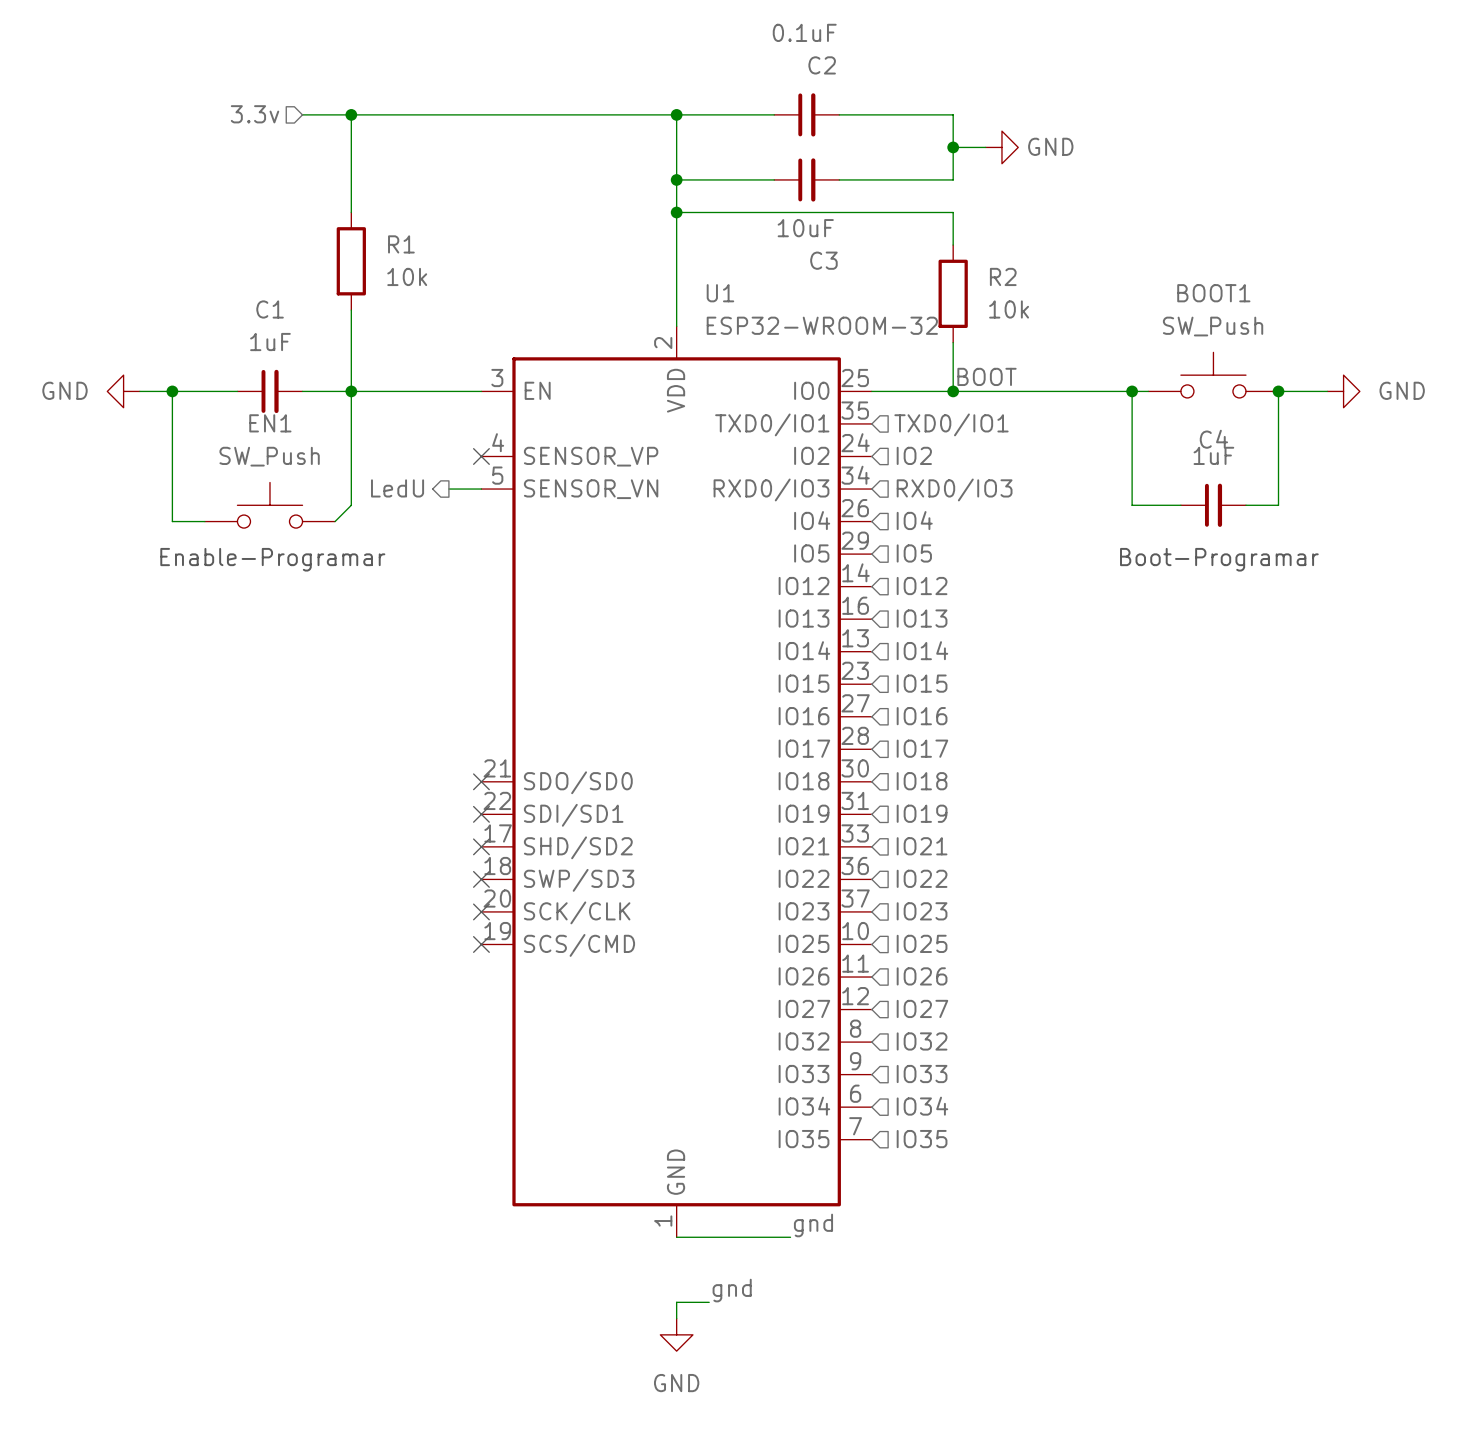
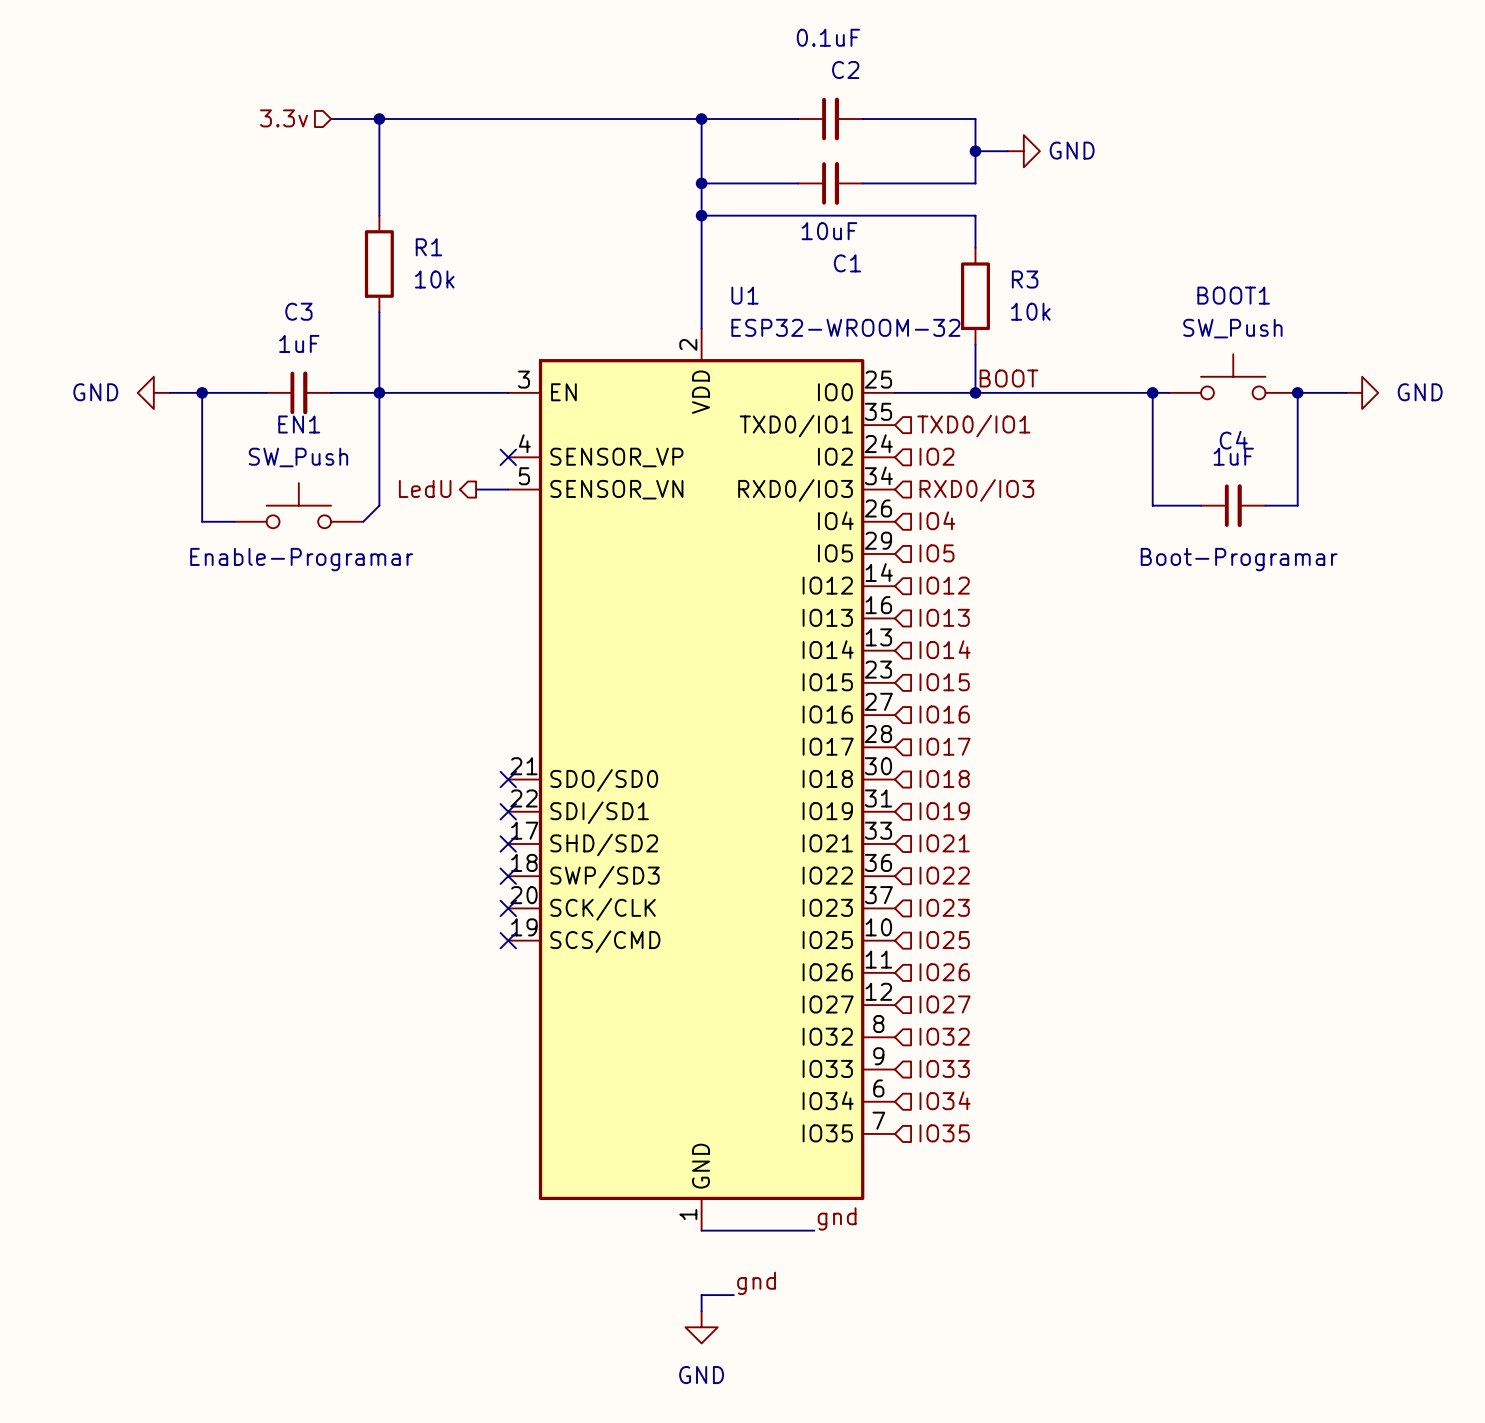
C3 name: C3 (823, 260) -> C1 (847, 263)
R2 name: R2 (1003, 276) -> R3 (1025, 279)
C1 name: C1 (270, 309) -> C3 (298, 311)

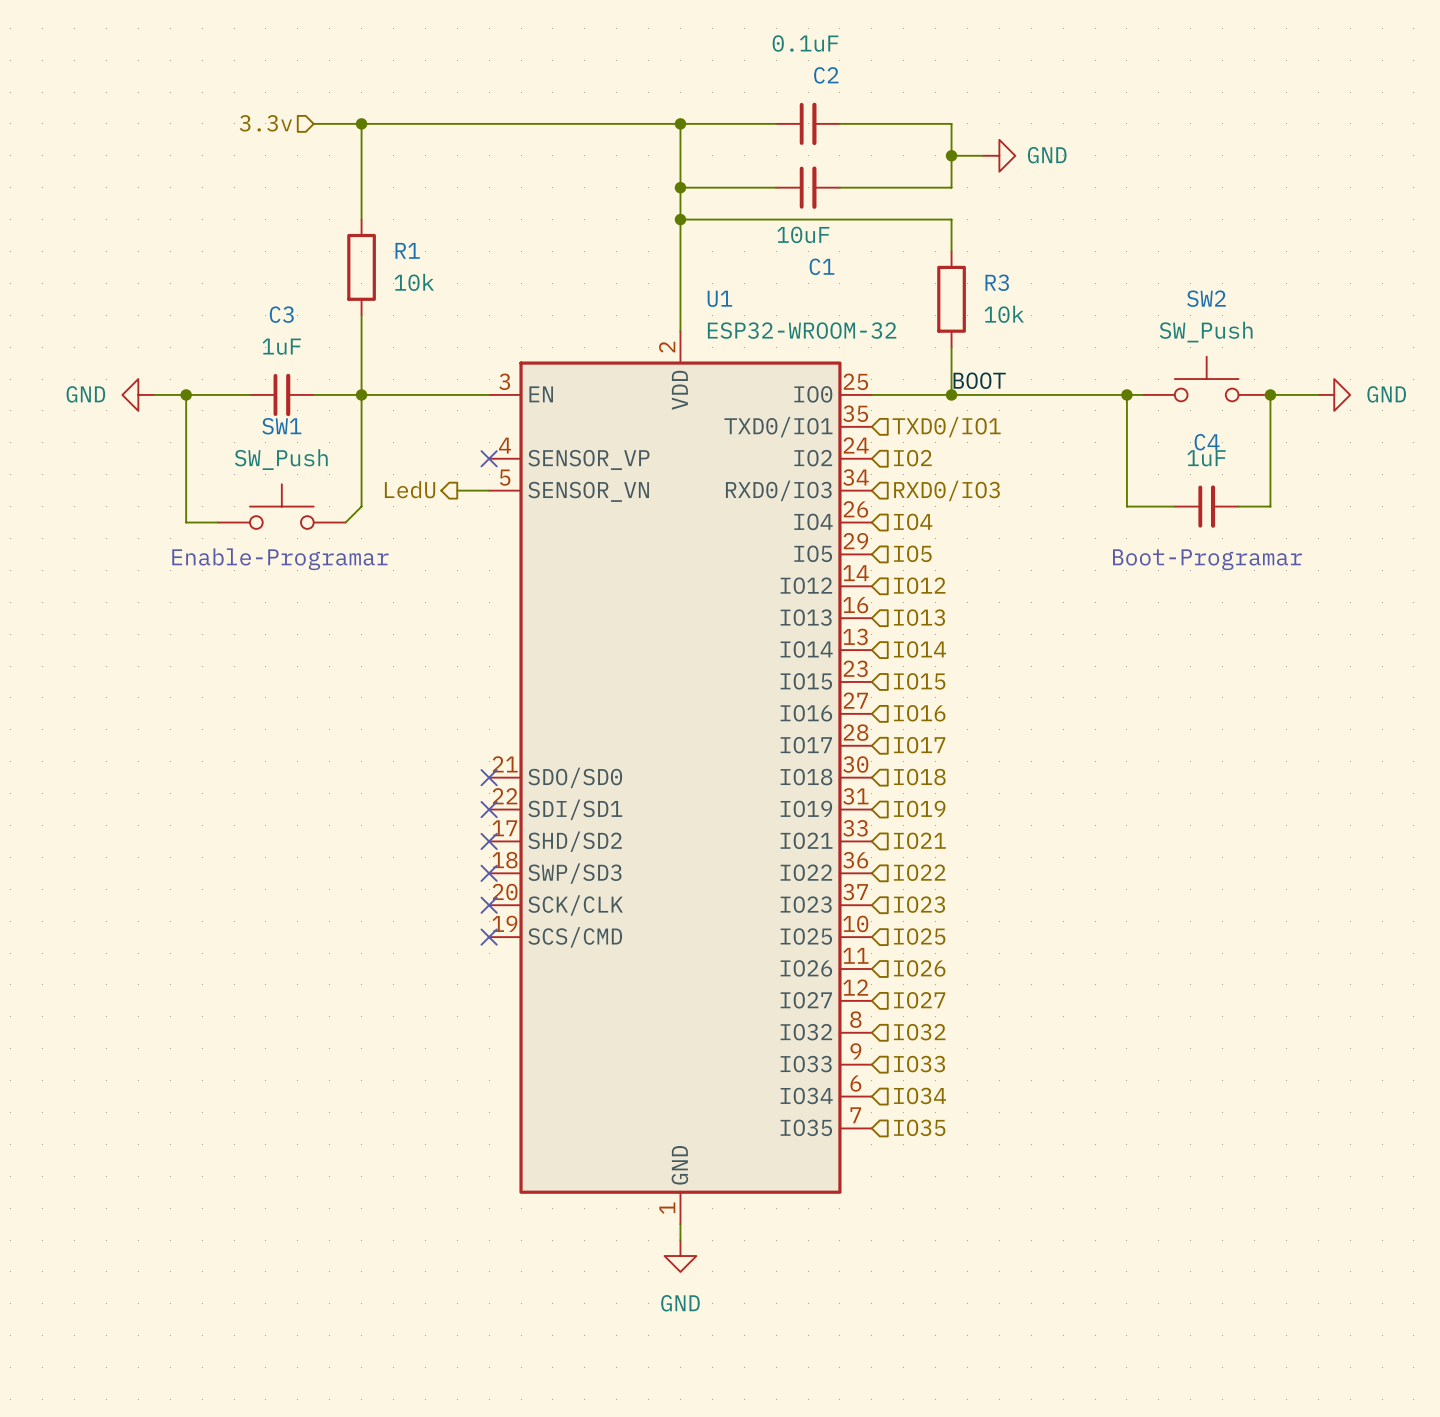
BOOT1 name: BOOT1 (1233, 295) -> SW2 (1206, 298)
EN1 name: EN1 (299, 424) -> SW1 (281, 426)
label: gnd (837, 1218) -> none
wire: (701, 1230) (814, 1230) -> (680, 1224) (680, 1240)
label: gnd (756, 1283) -> none
wire: (733, 1295) (701, 1295) (701, 1311) -> none
power symbol position: GND (701, 1327) -> GND (680, 1256)

